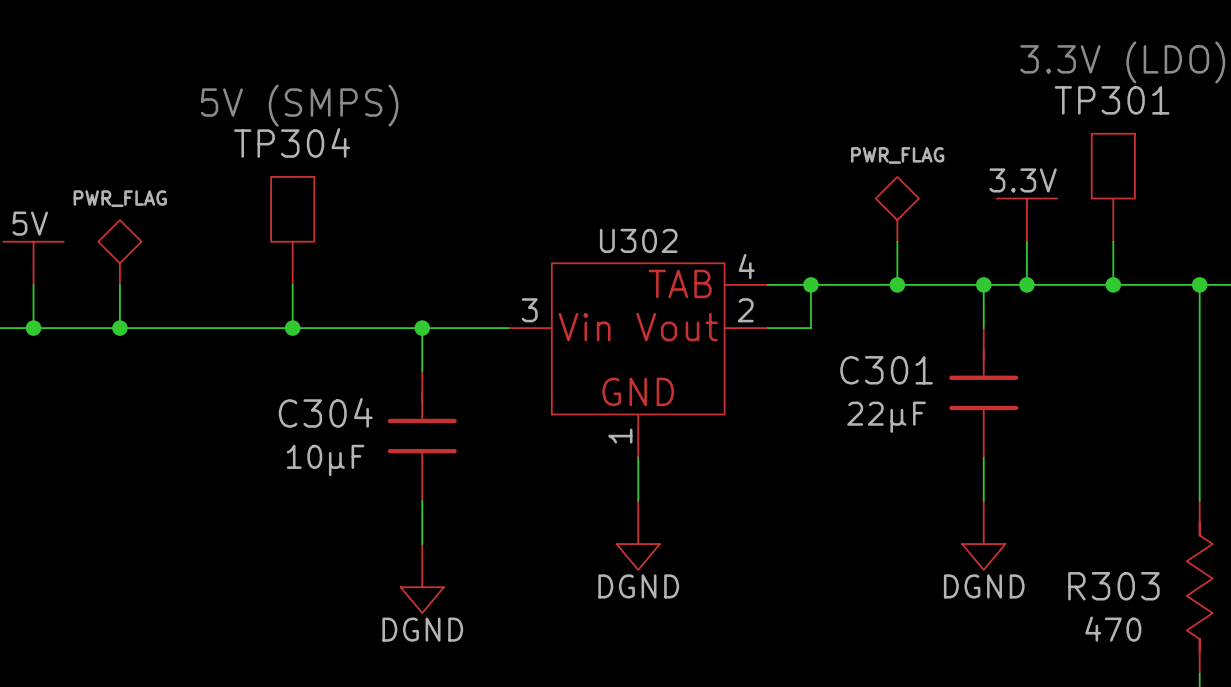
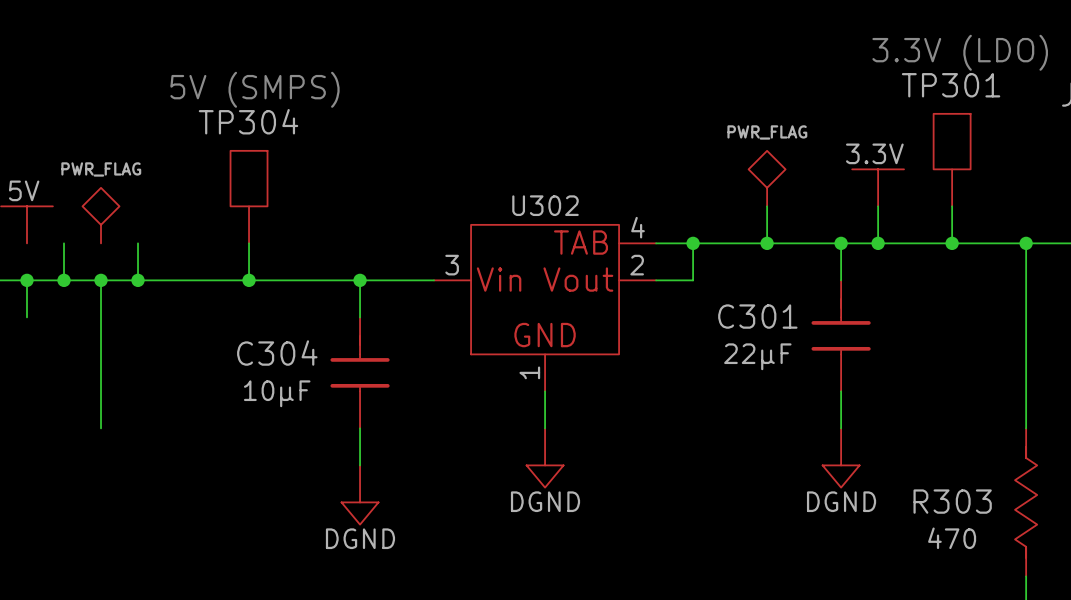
wire: (33, 284) (33, 328) -> (26, 317) (26, 280)
wire: none -> (64, 243) (64, 280)
wire: (119, 284) (119, 328) -> (101, 428) (101, 280)
wire: none -> (138, 243) (138, 280)
junction: none -> (64, 280)
junction: none -> (138, 280)

